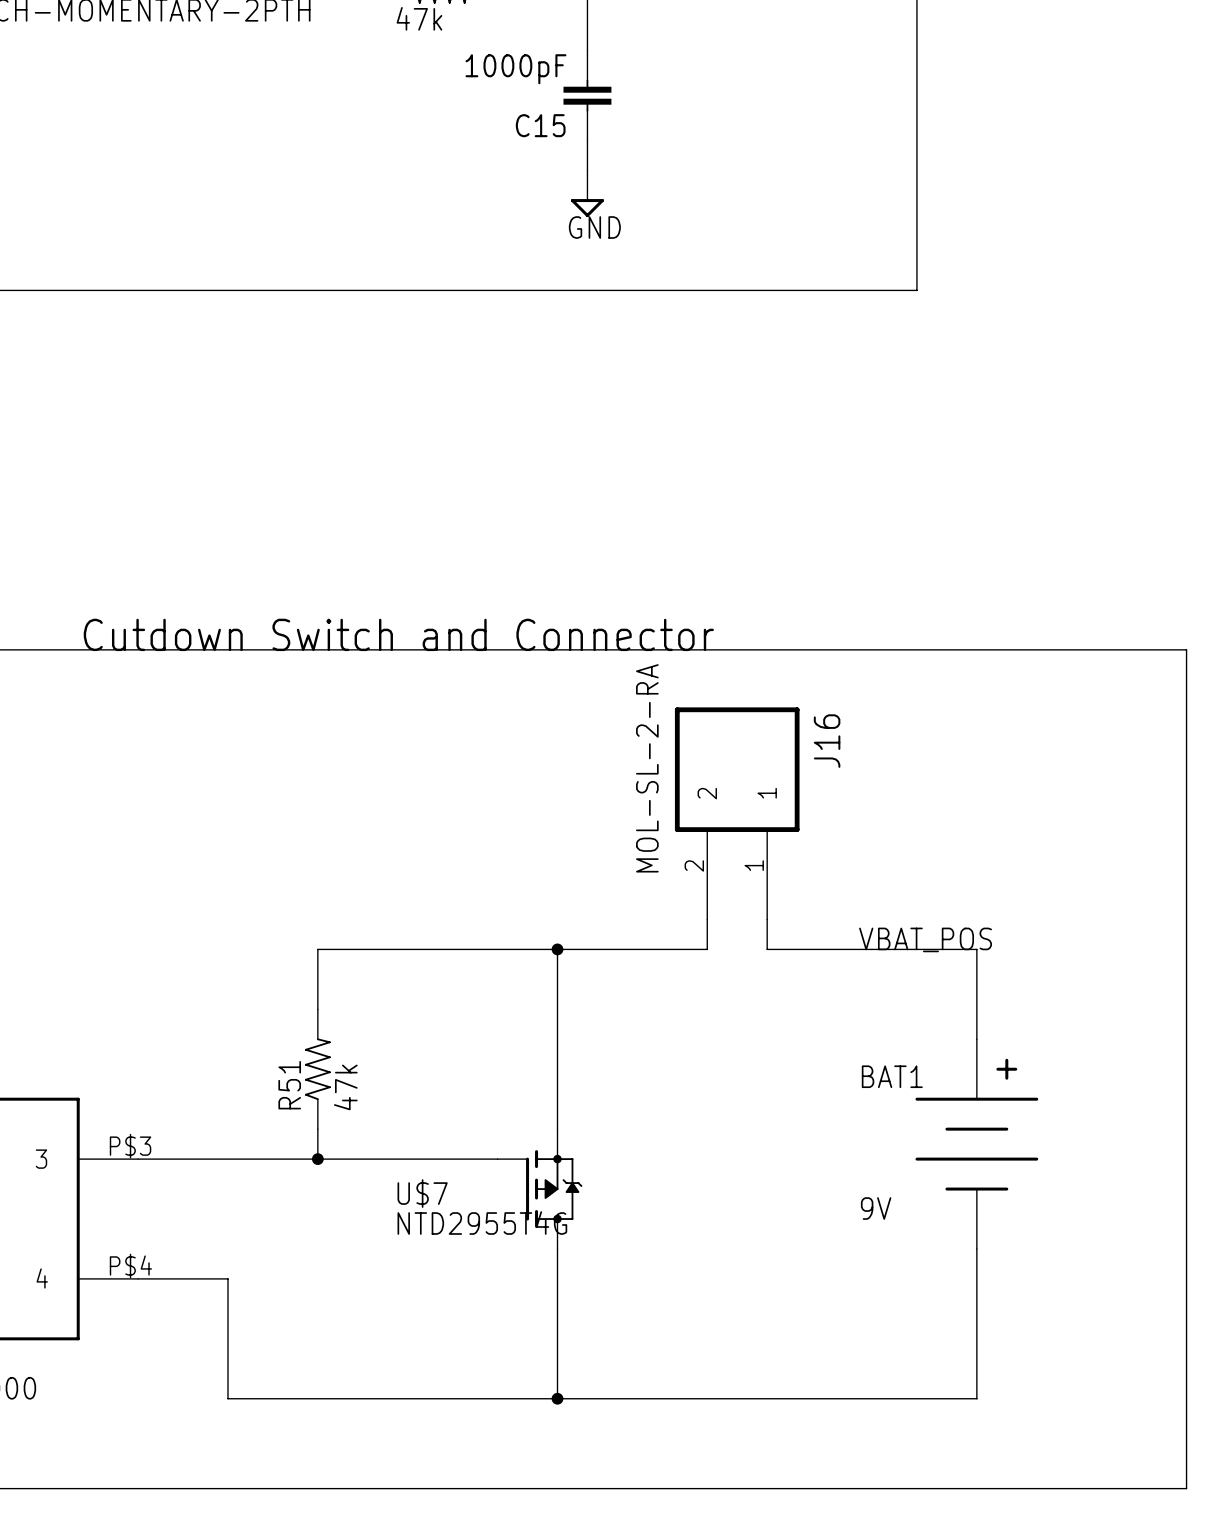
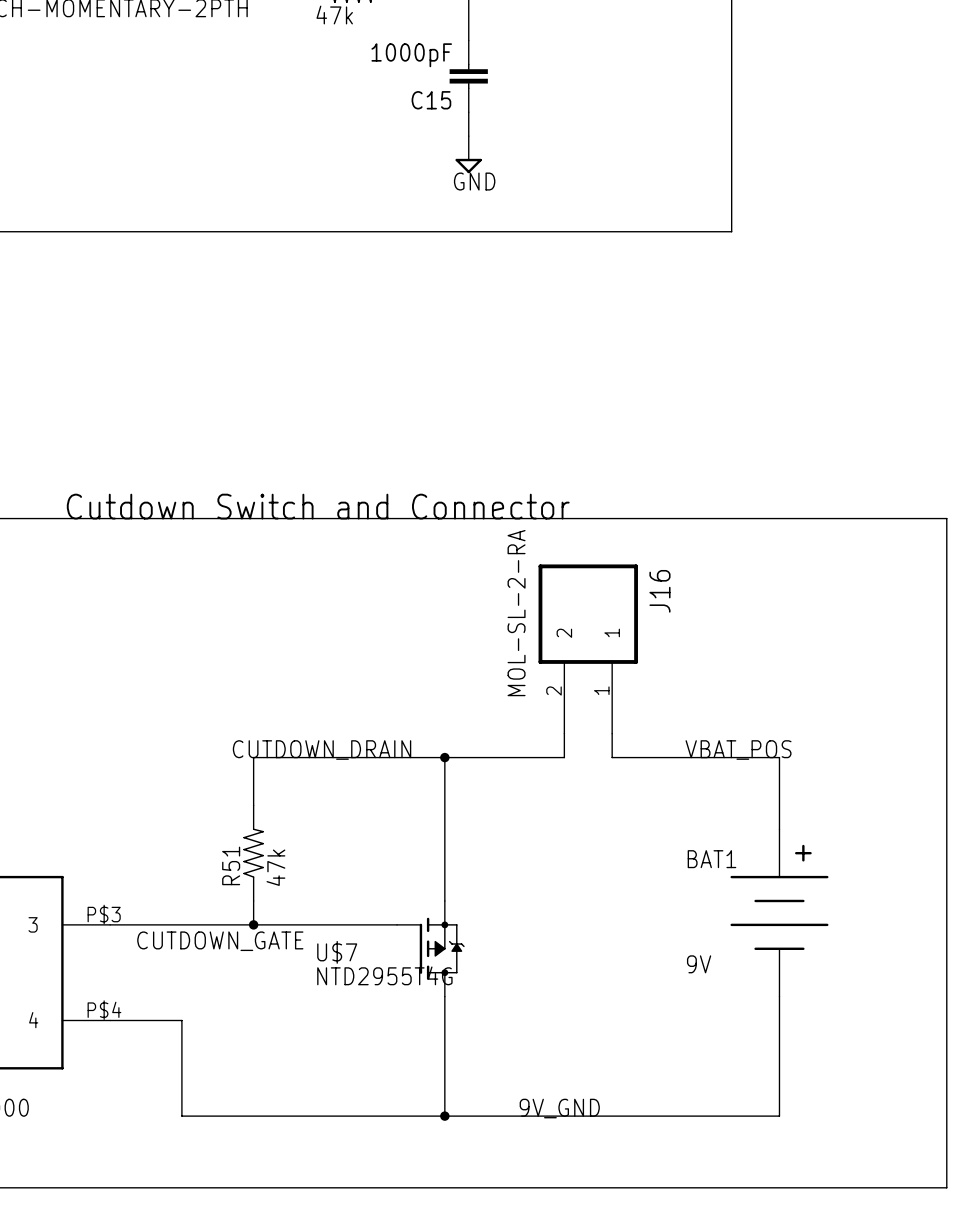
label: none -> CUTDOWN_DRAIN (322, 750)
label: none -> CUTDOWN_GATE (220, 941)
label: none -> 9V_GND (559, 1108)

